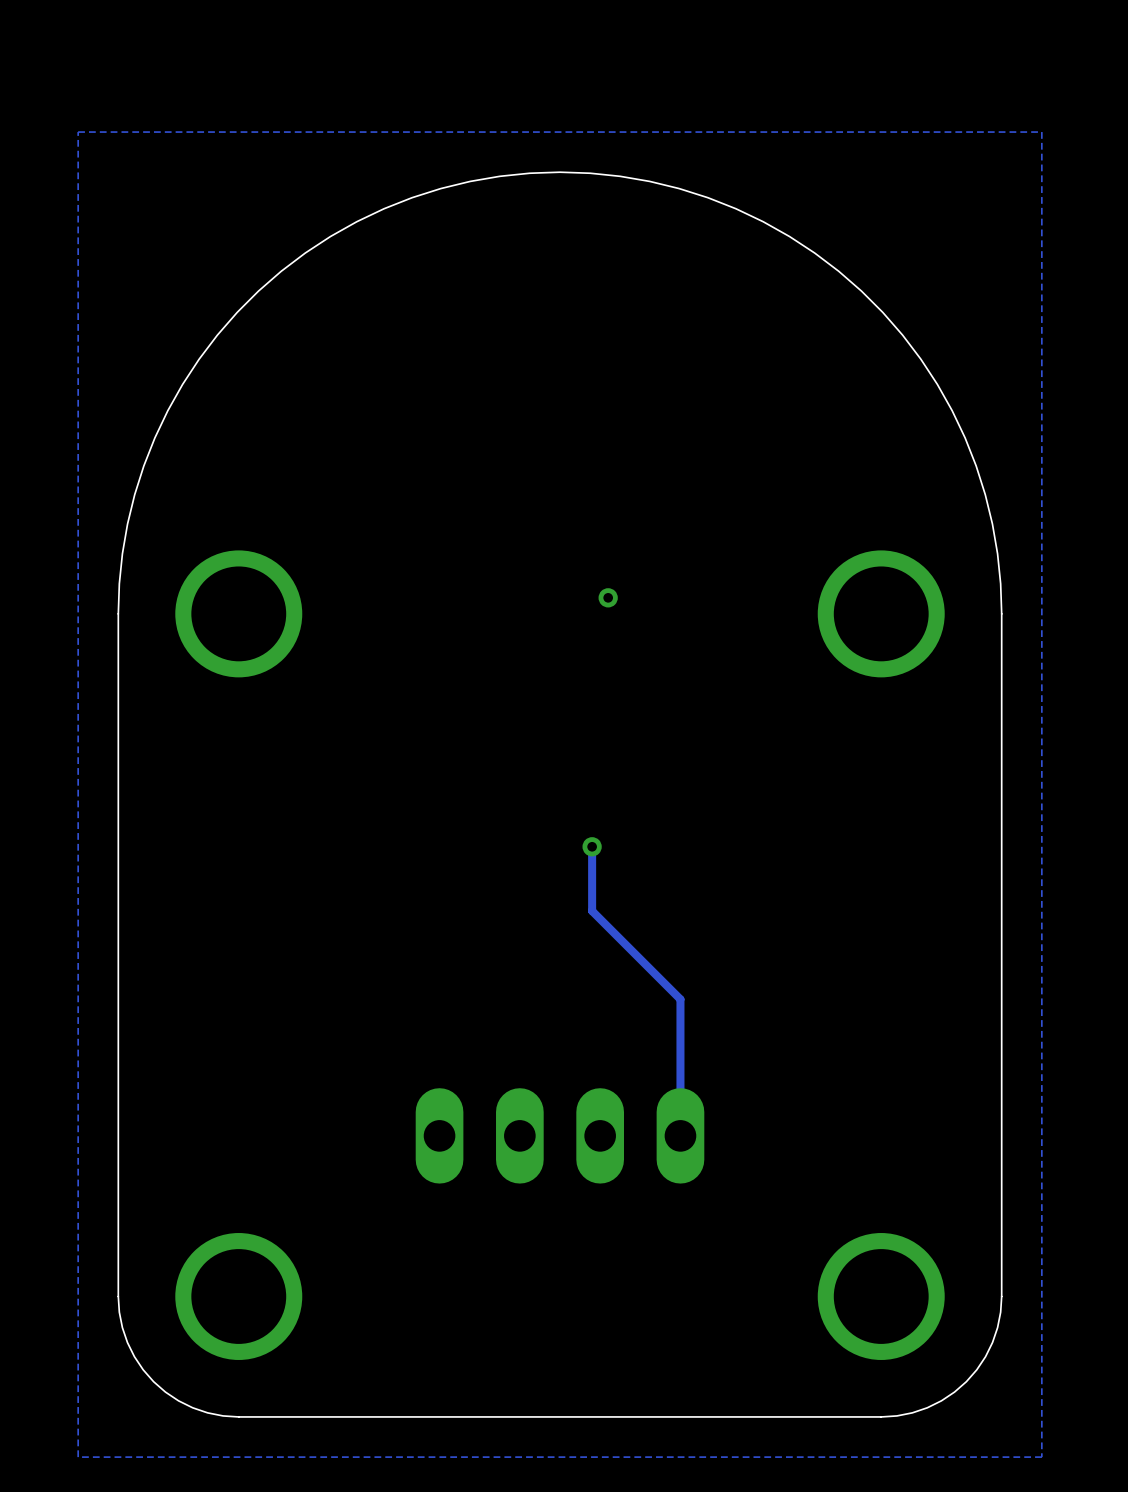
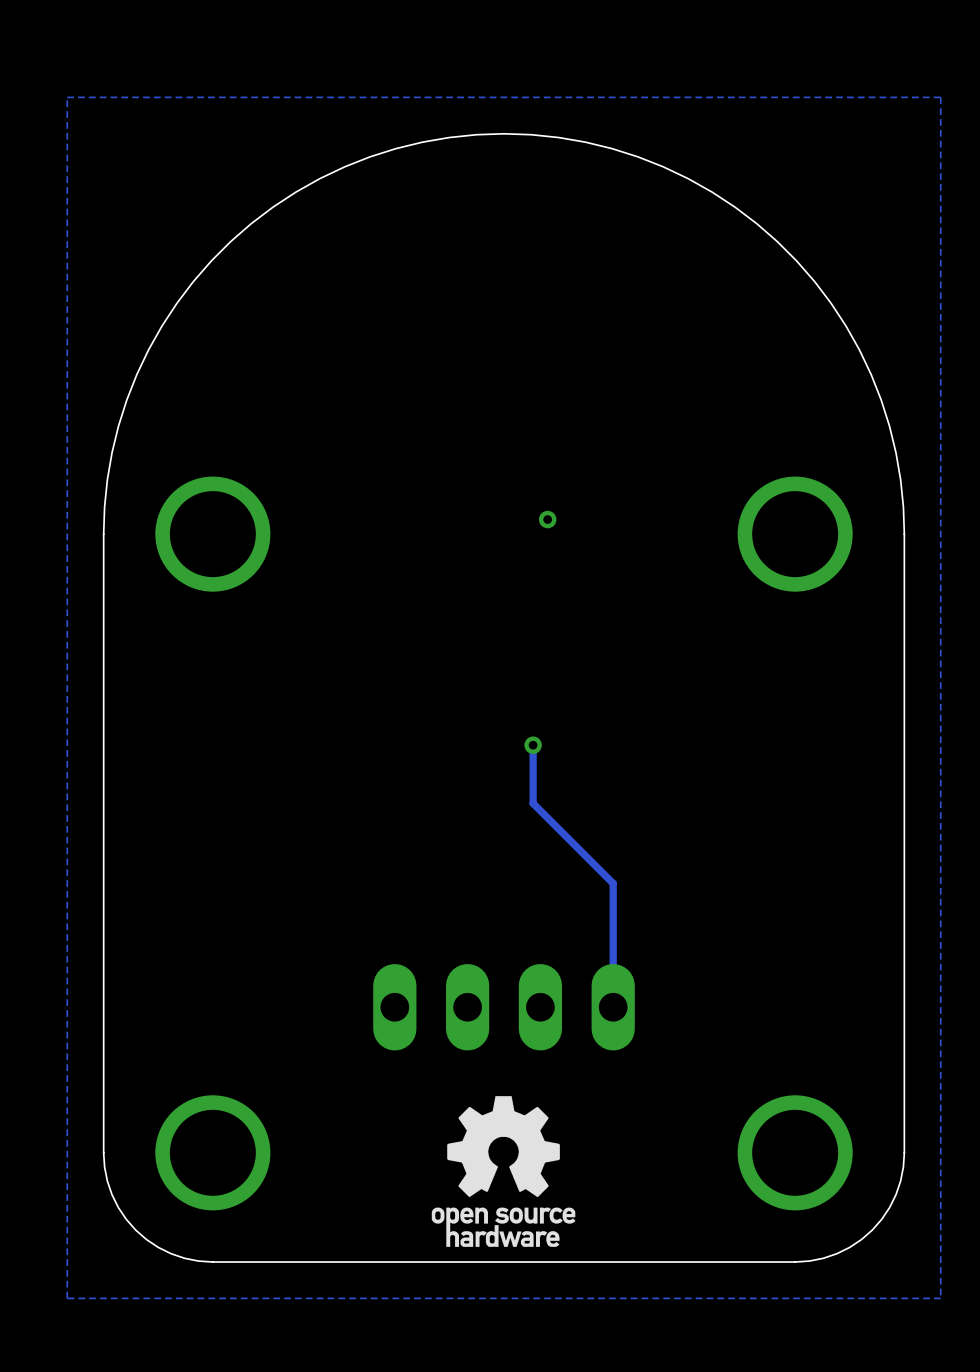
drawing: none -> [431, 1096, 576, 1247]

